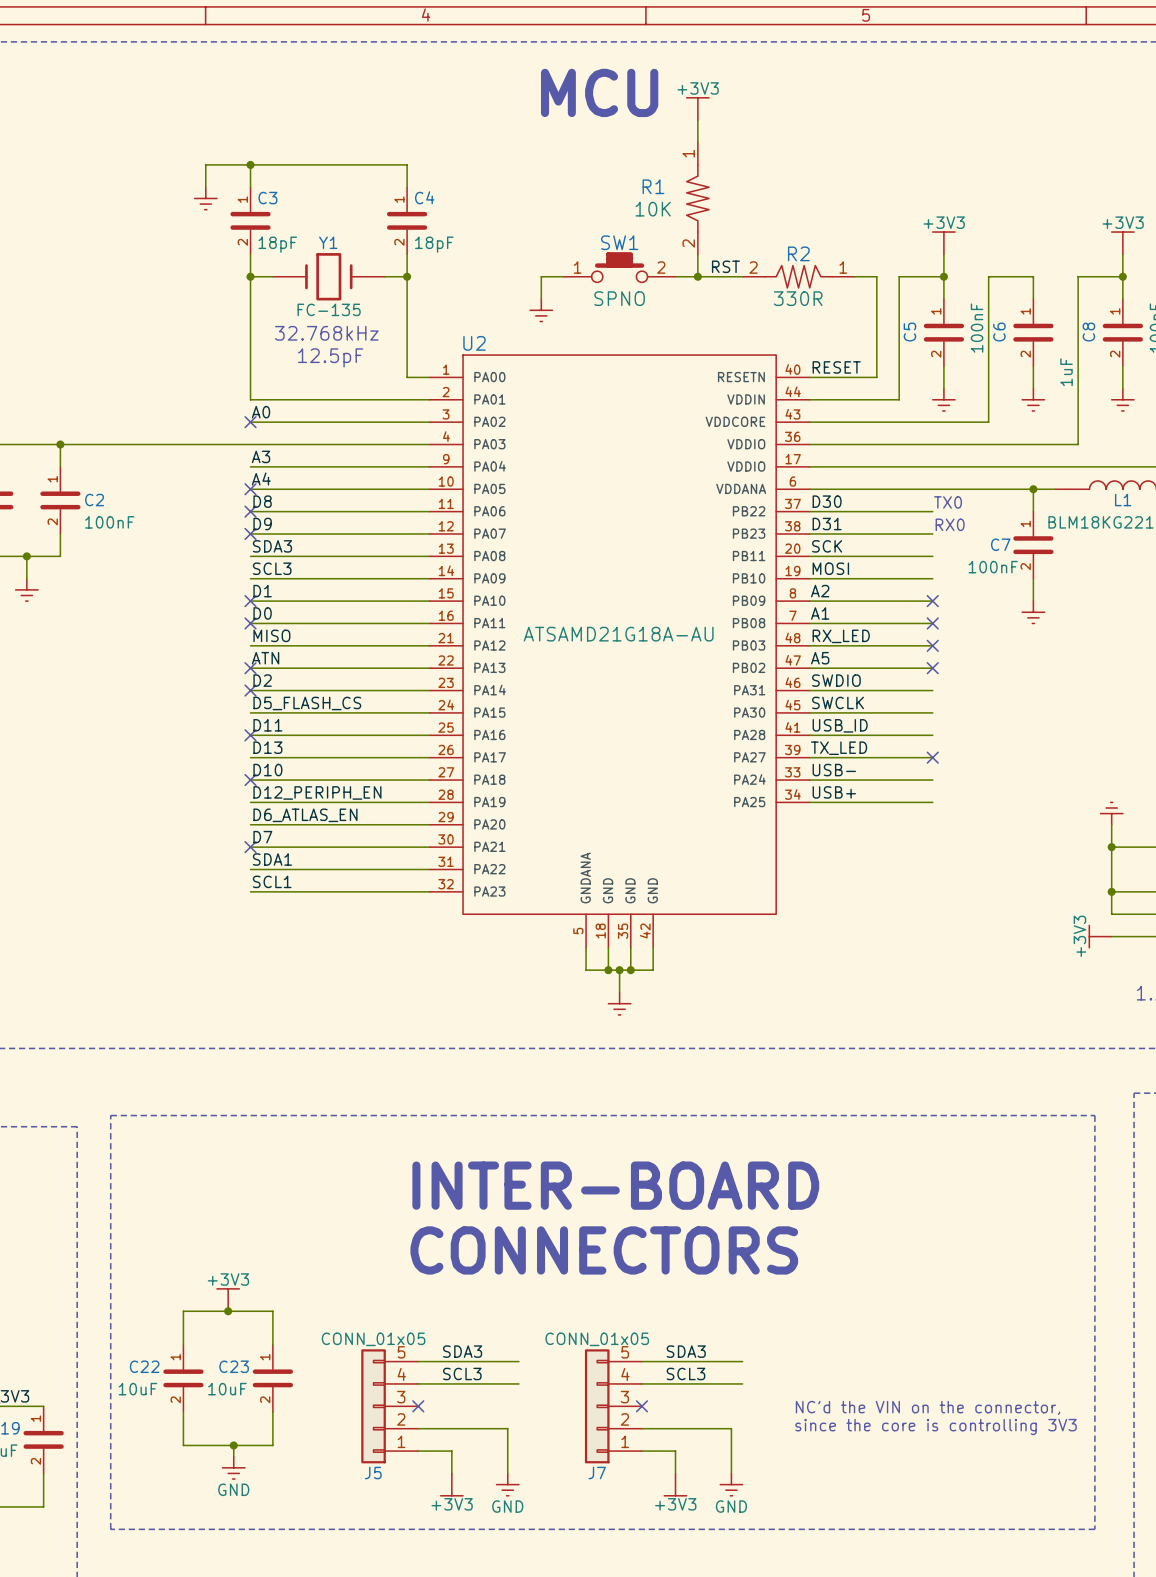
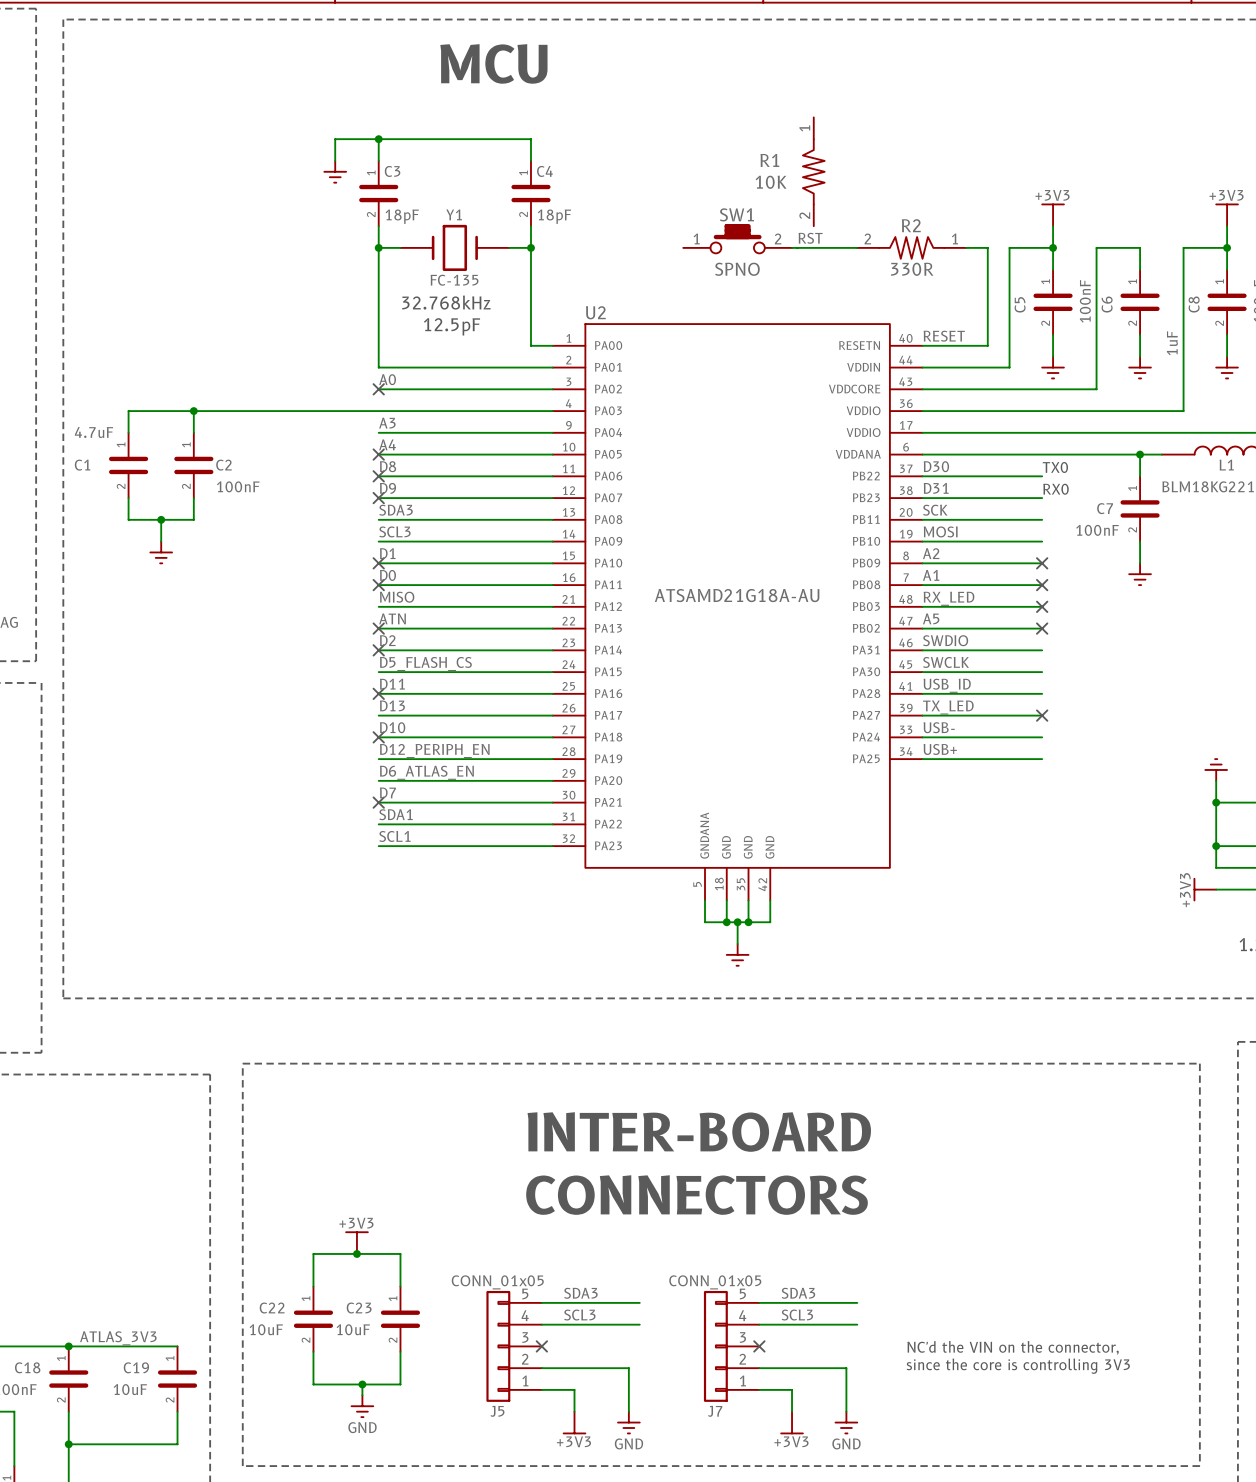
text position: MCU (599, 92) -> MCU (493, 63)
power symbol: +3V3 (697, 109) -> none
wire: (697, 120) (697, 142) -> none
wire: (697, 254) (697, 276) -> none
label position: RST (725, 266) -> RST (810, 238)
wire: (563, 276) (541, 276) (541, 299) -> none
junction: (697, 276) -> none
power symbol: (541, 310) -> none

